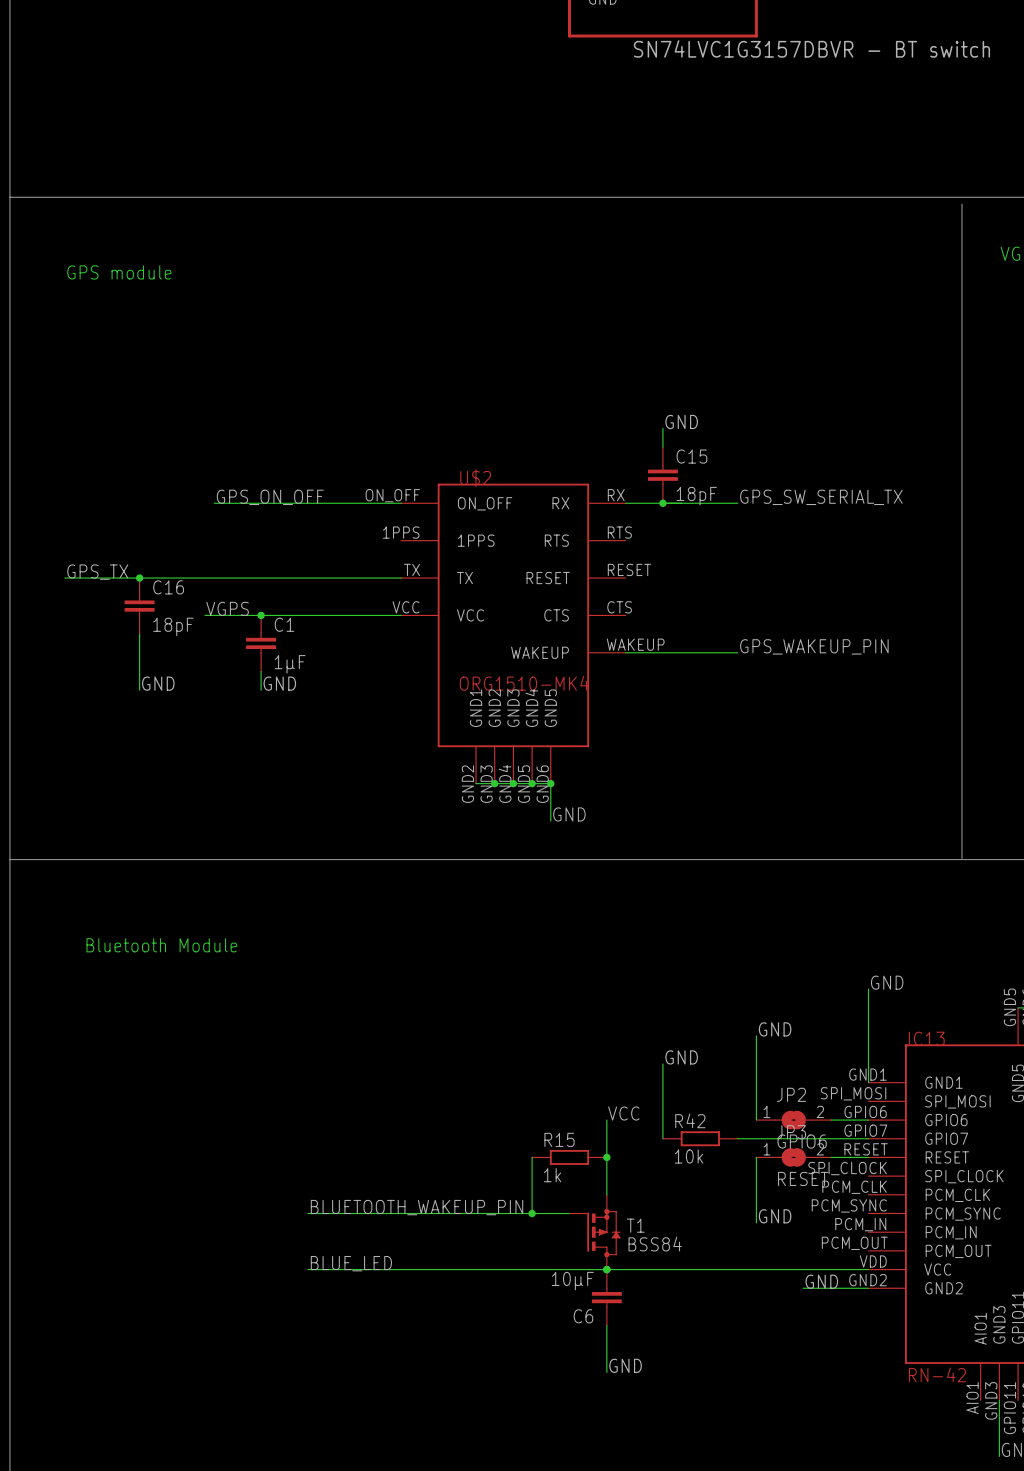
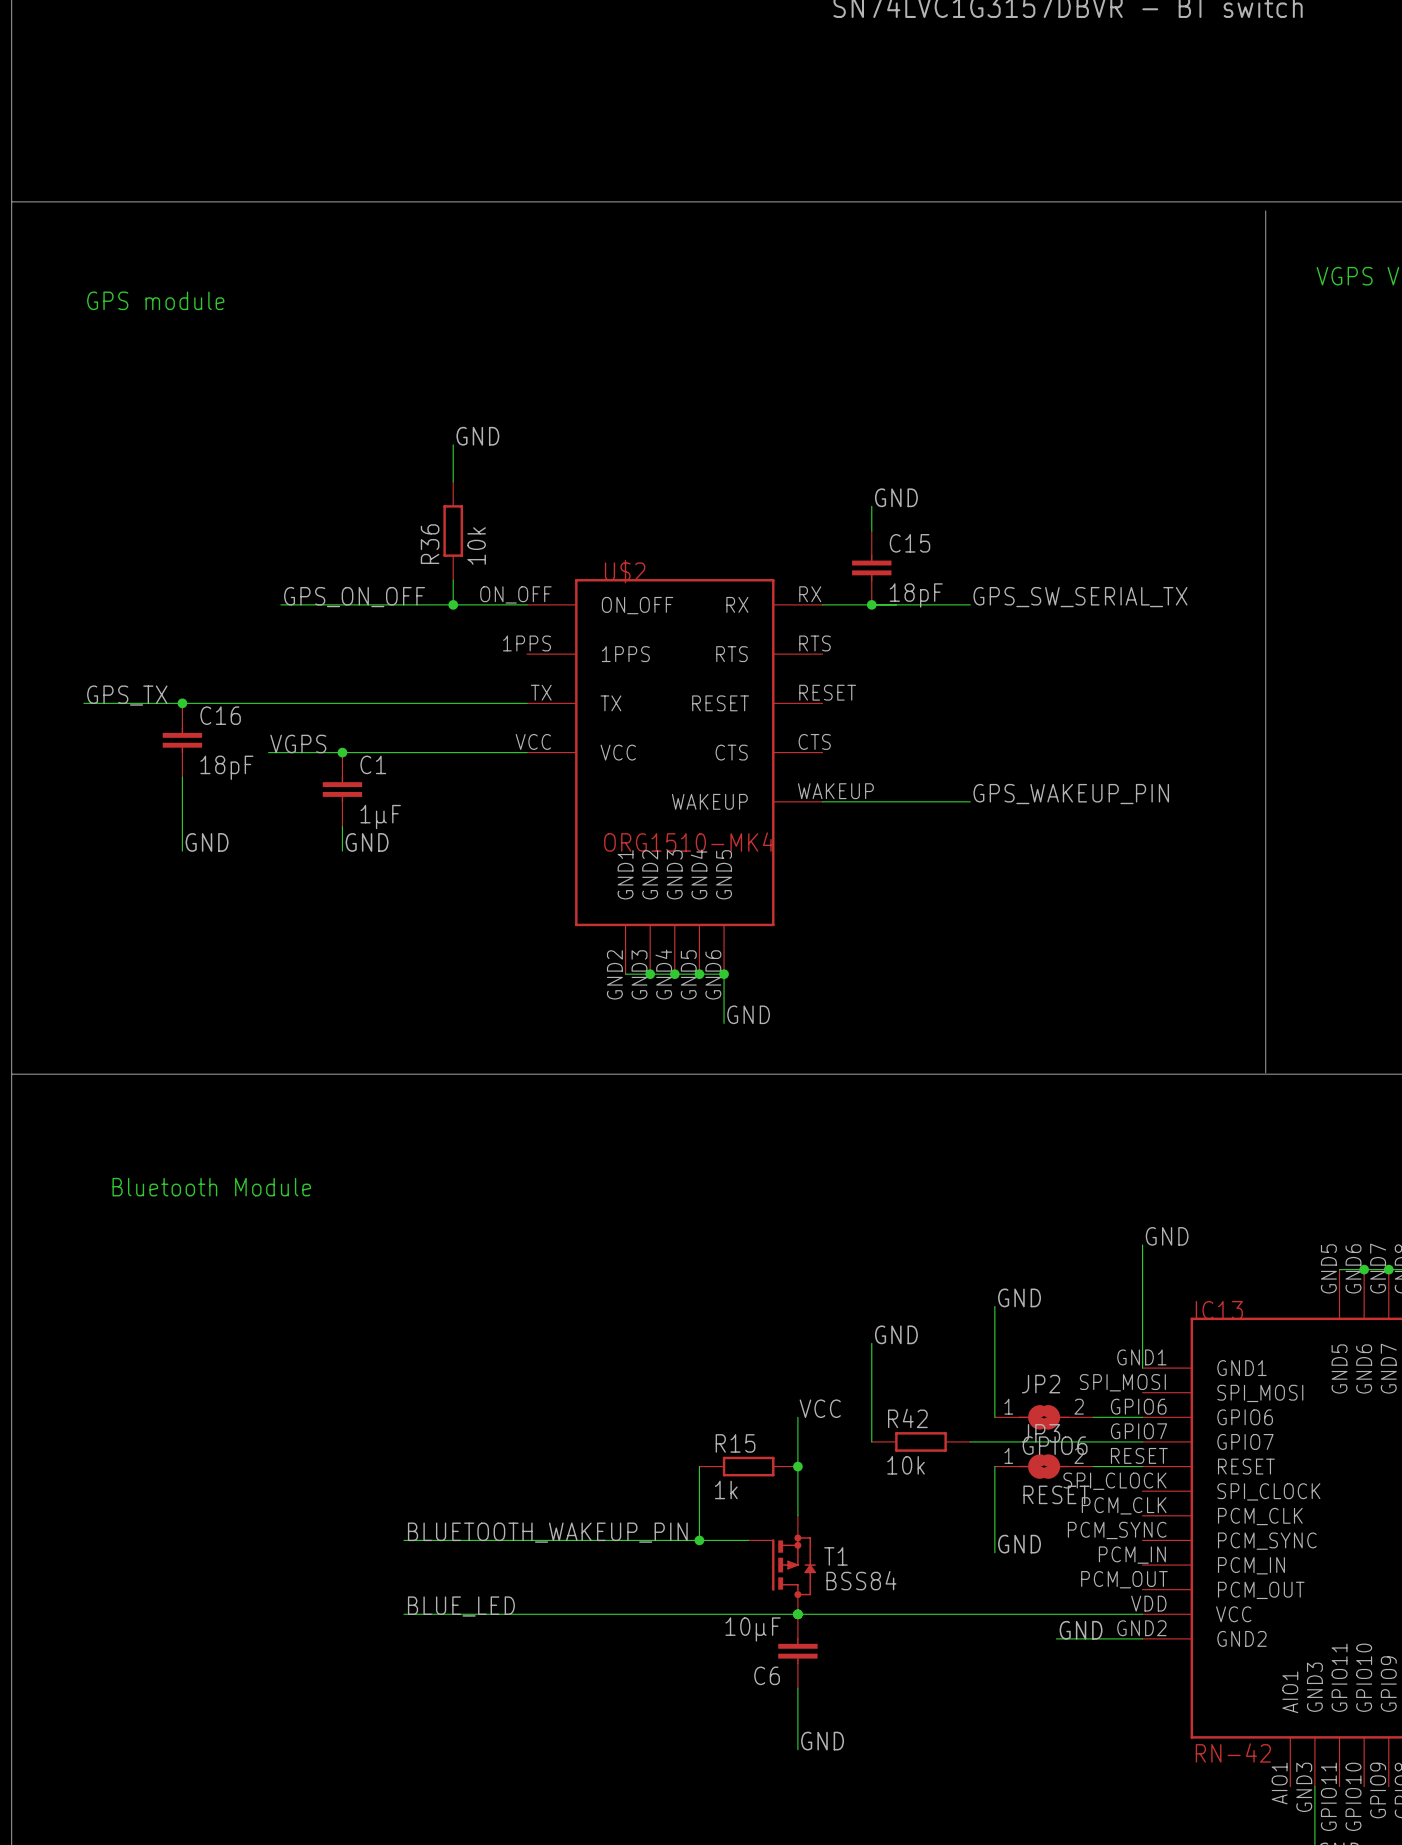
label: none -> GND (477, 436)
wire: none -> (453, 444) (453, 481)
R36: none -> 10k (453, 531)
wire: none -> (453, 580) (453, 604)
junction: none -> (453, 604)

